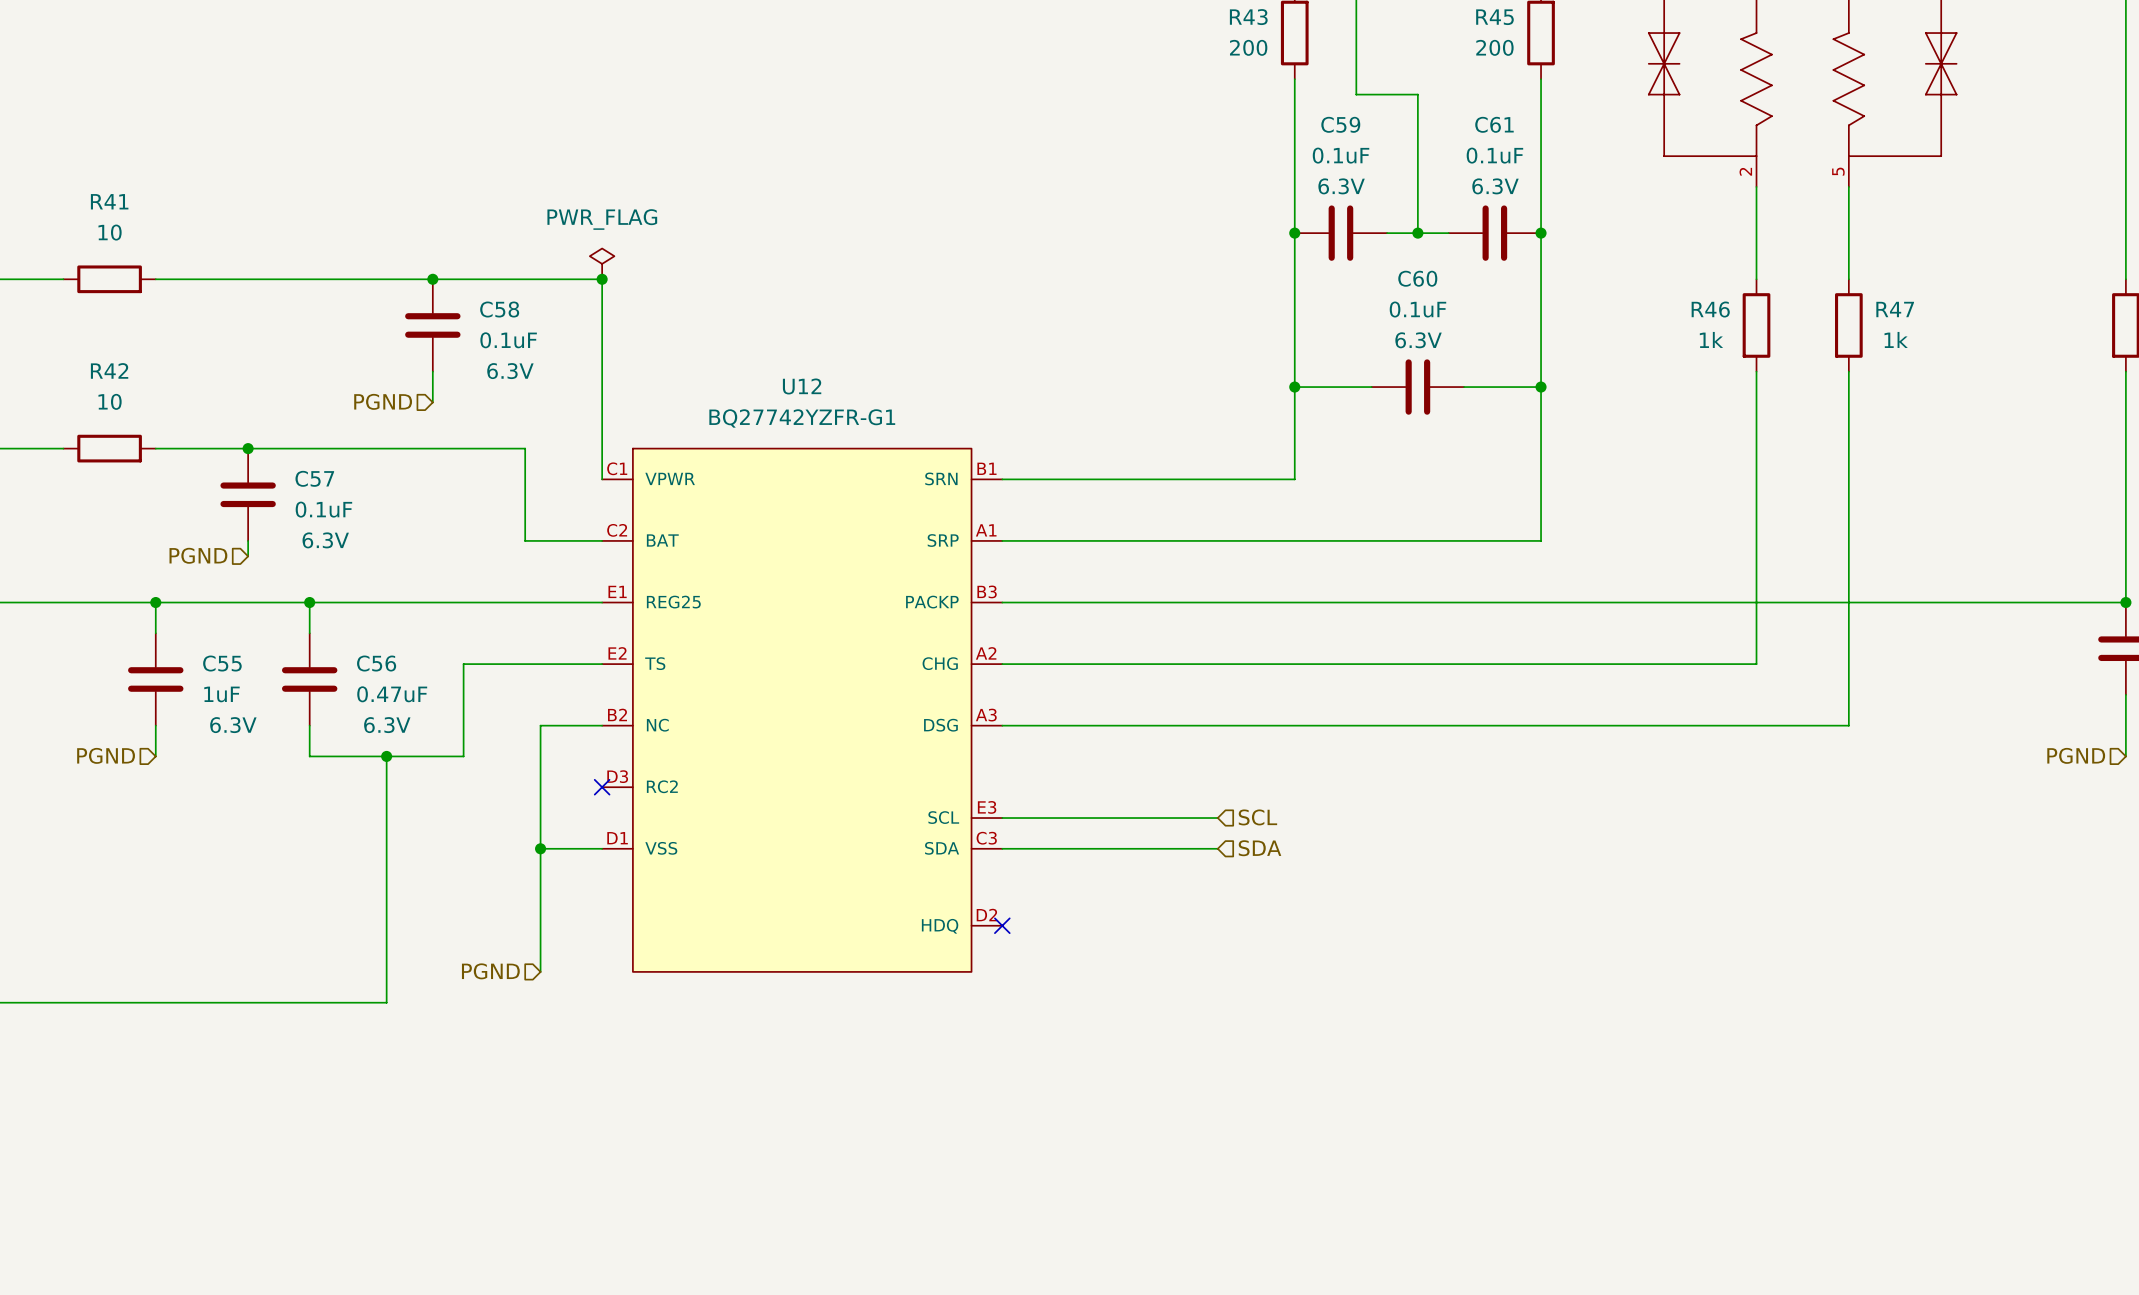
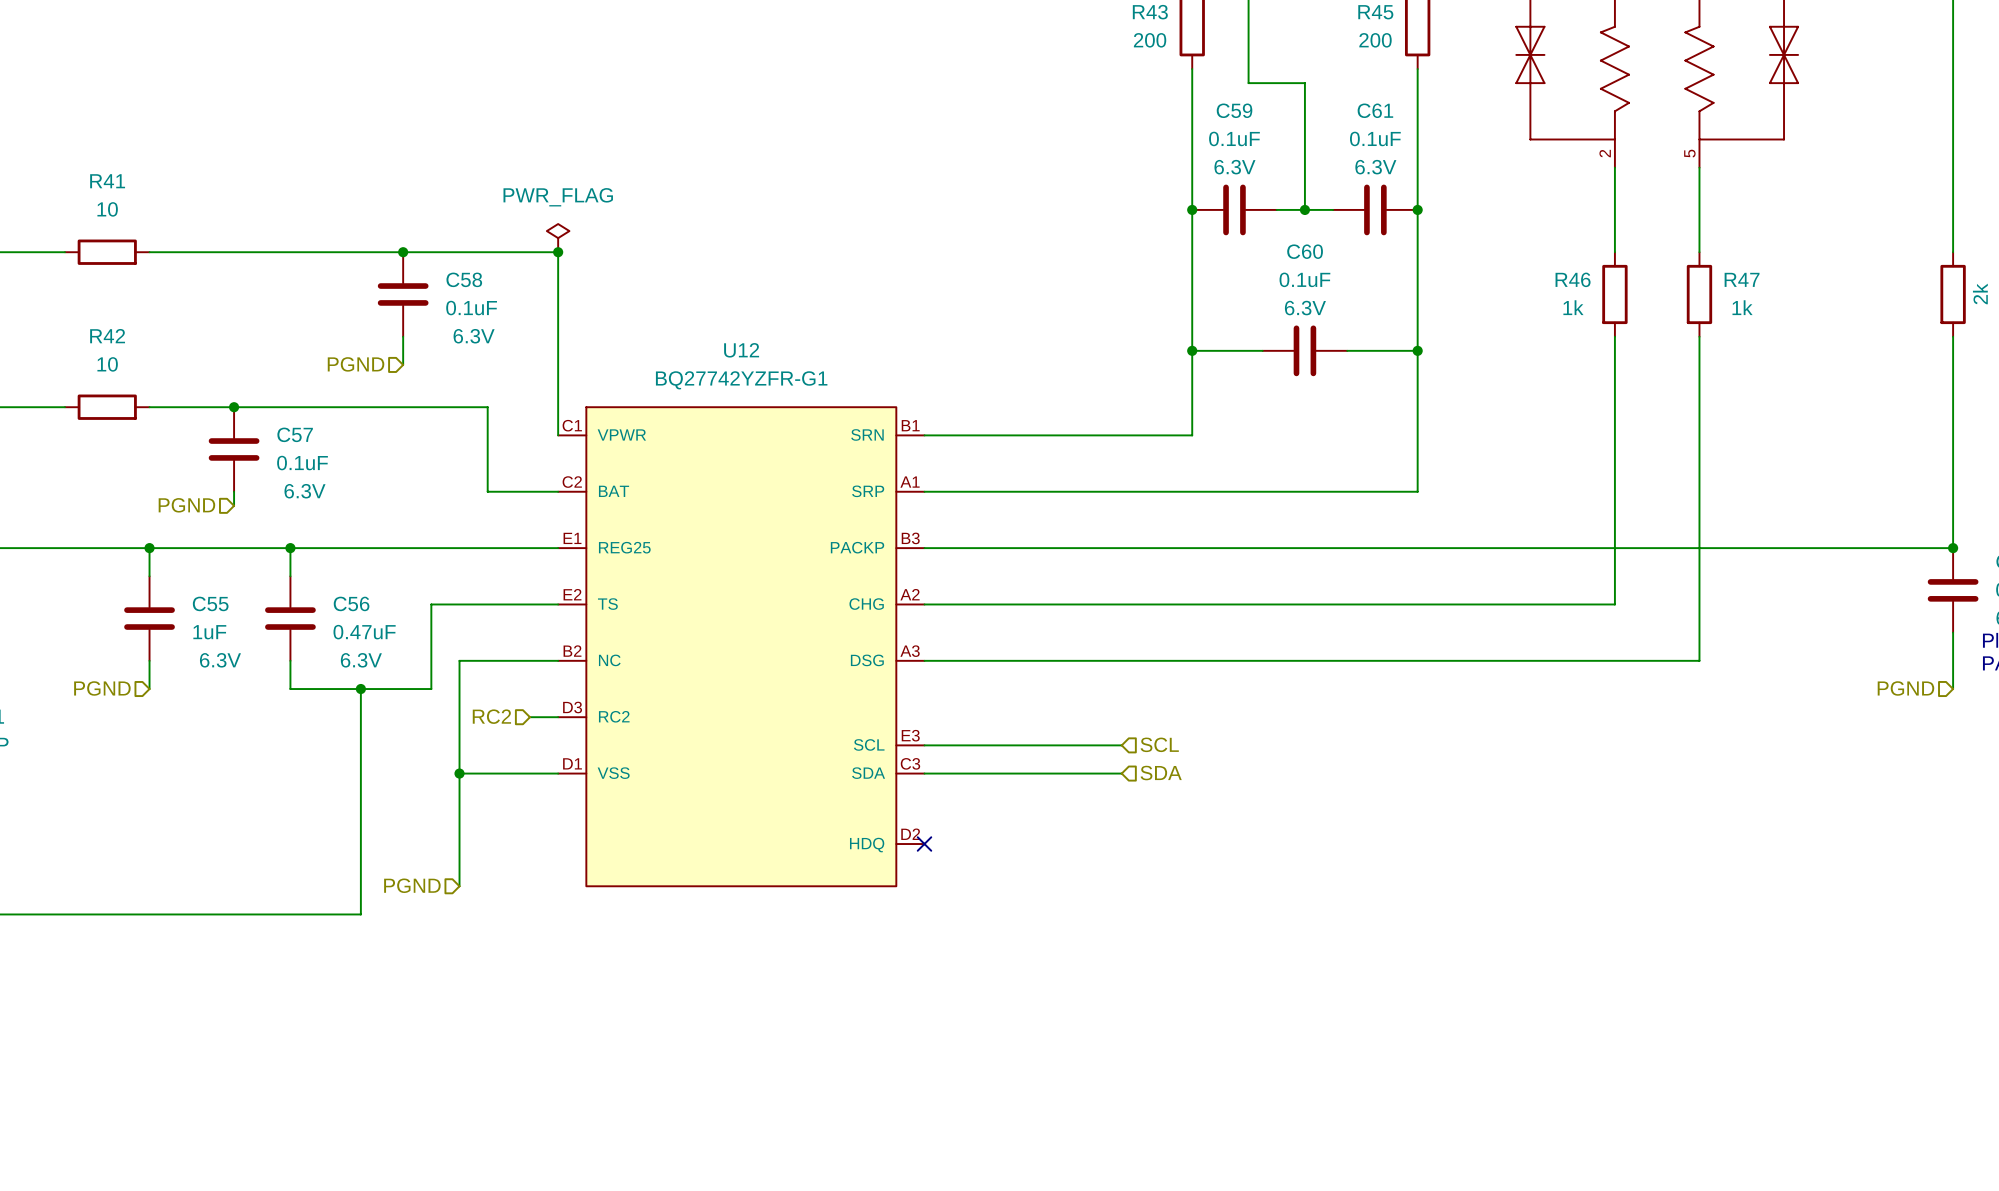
wire: (540, 725) (540, 971) -> (501, 660) (459, 660) (459, 886)
hierarchical label: none -> RC2 (491, 716)
wire: none -> (529, 717) (558, 717)
no-connect mark: (602, 787) -> none
wire: none -> (459, 773) (501, 773)
junction position: (540, 848) -> (459, 773)
hierarchical label position: PGND (490, 971) -> PGND (412, 885)

